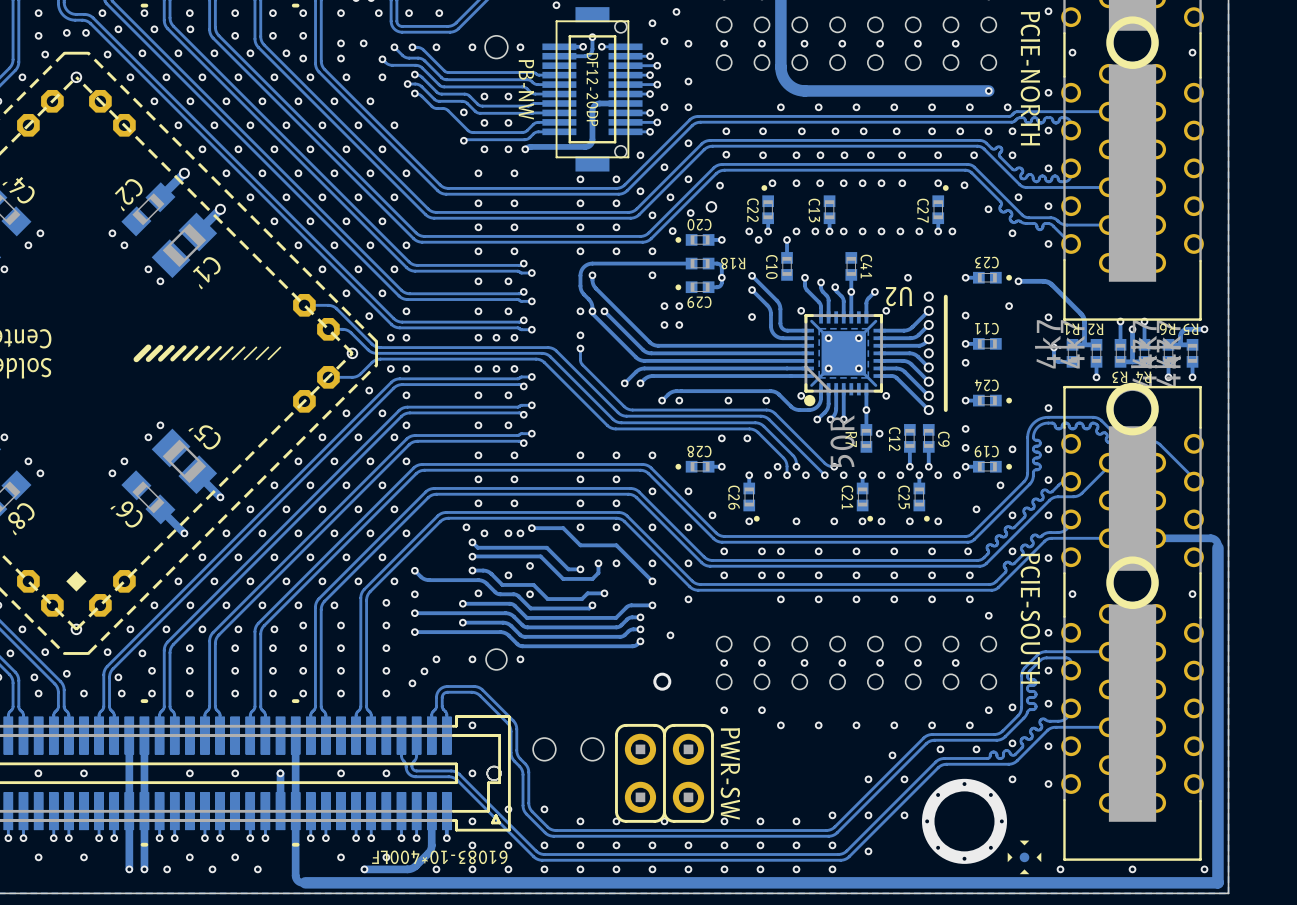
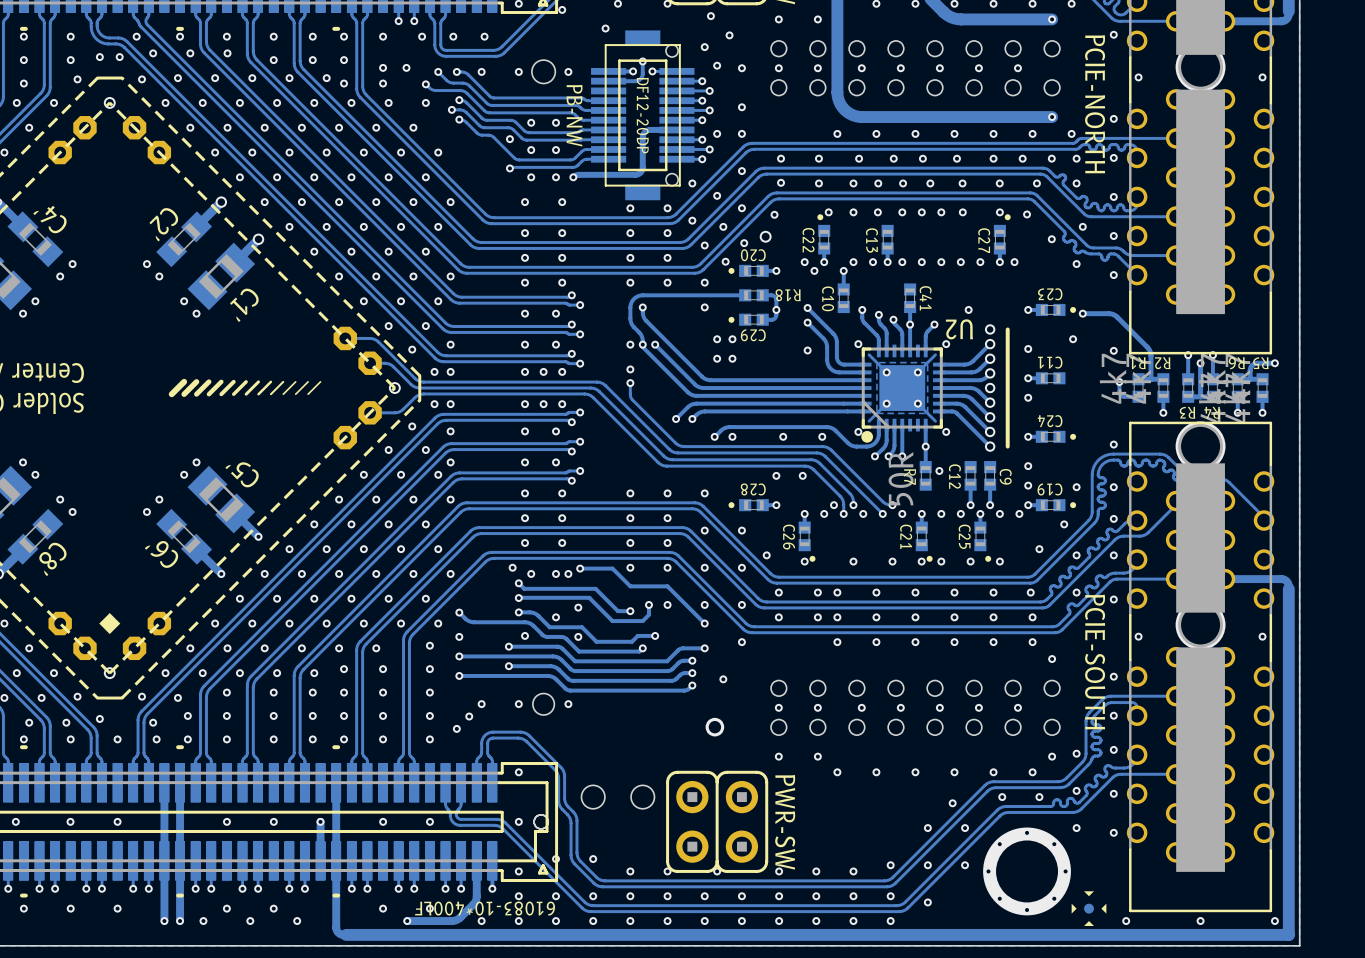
drawing: [1106, 16, 1159, 69] -> none
drawing: [1106, 382, 1159, 436] -> none
drawing: [1106, 556, 1159, 610] -> none

